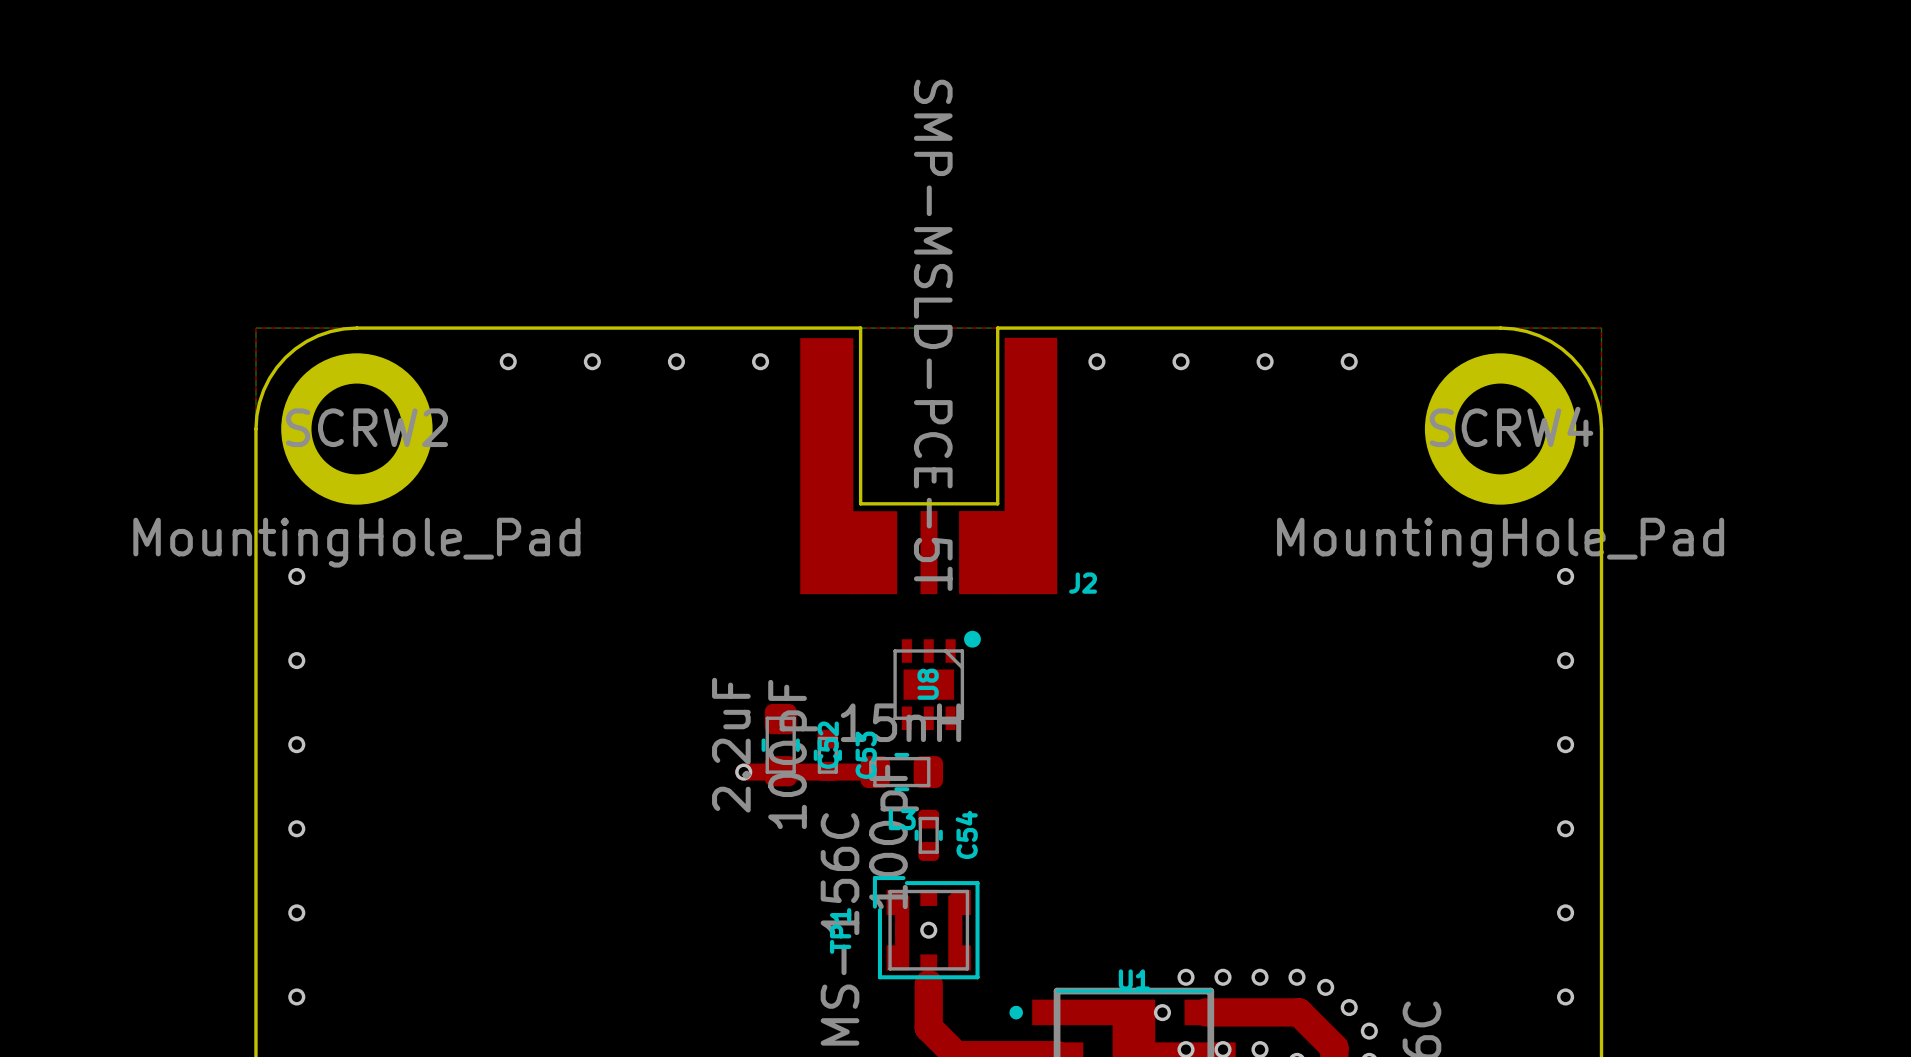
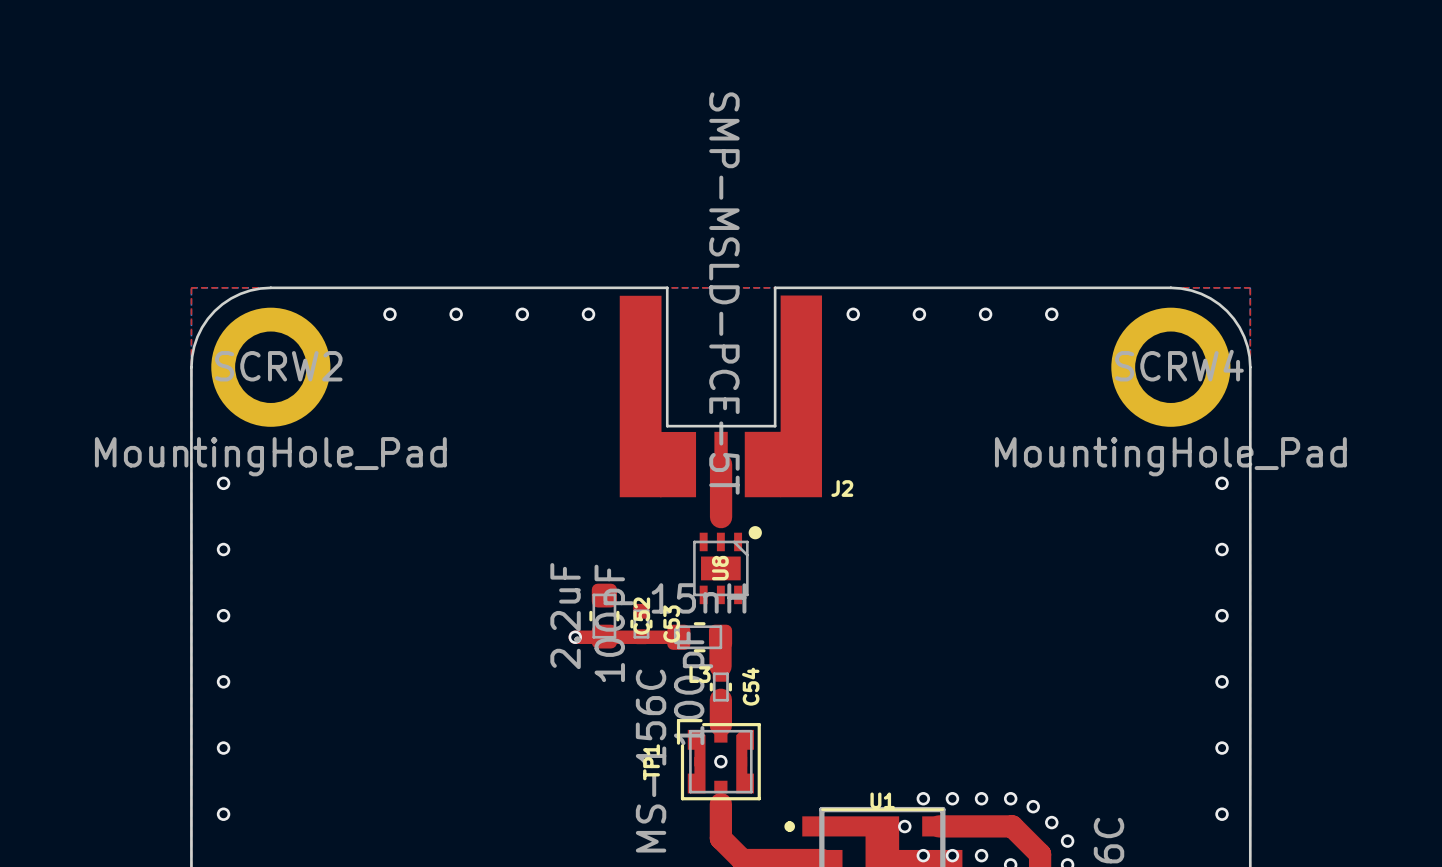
top track: none -> (721, 464) (721, 517)
top track: none -> (720, 637) (720, 666)
top track: none -> (720, 699) (720, 725)

